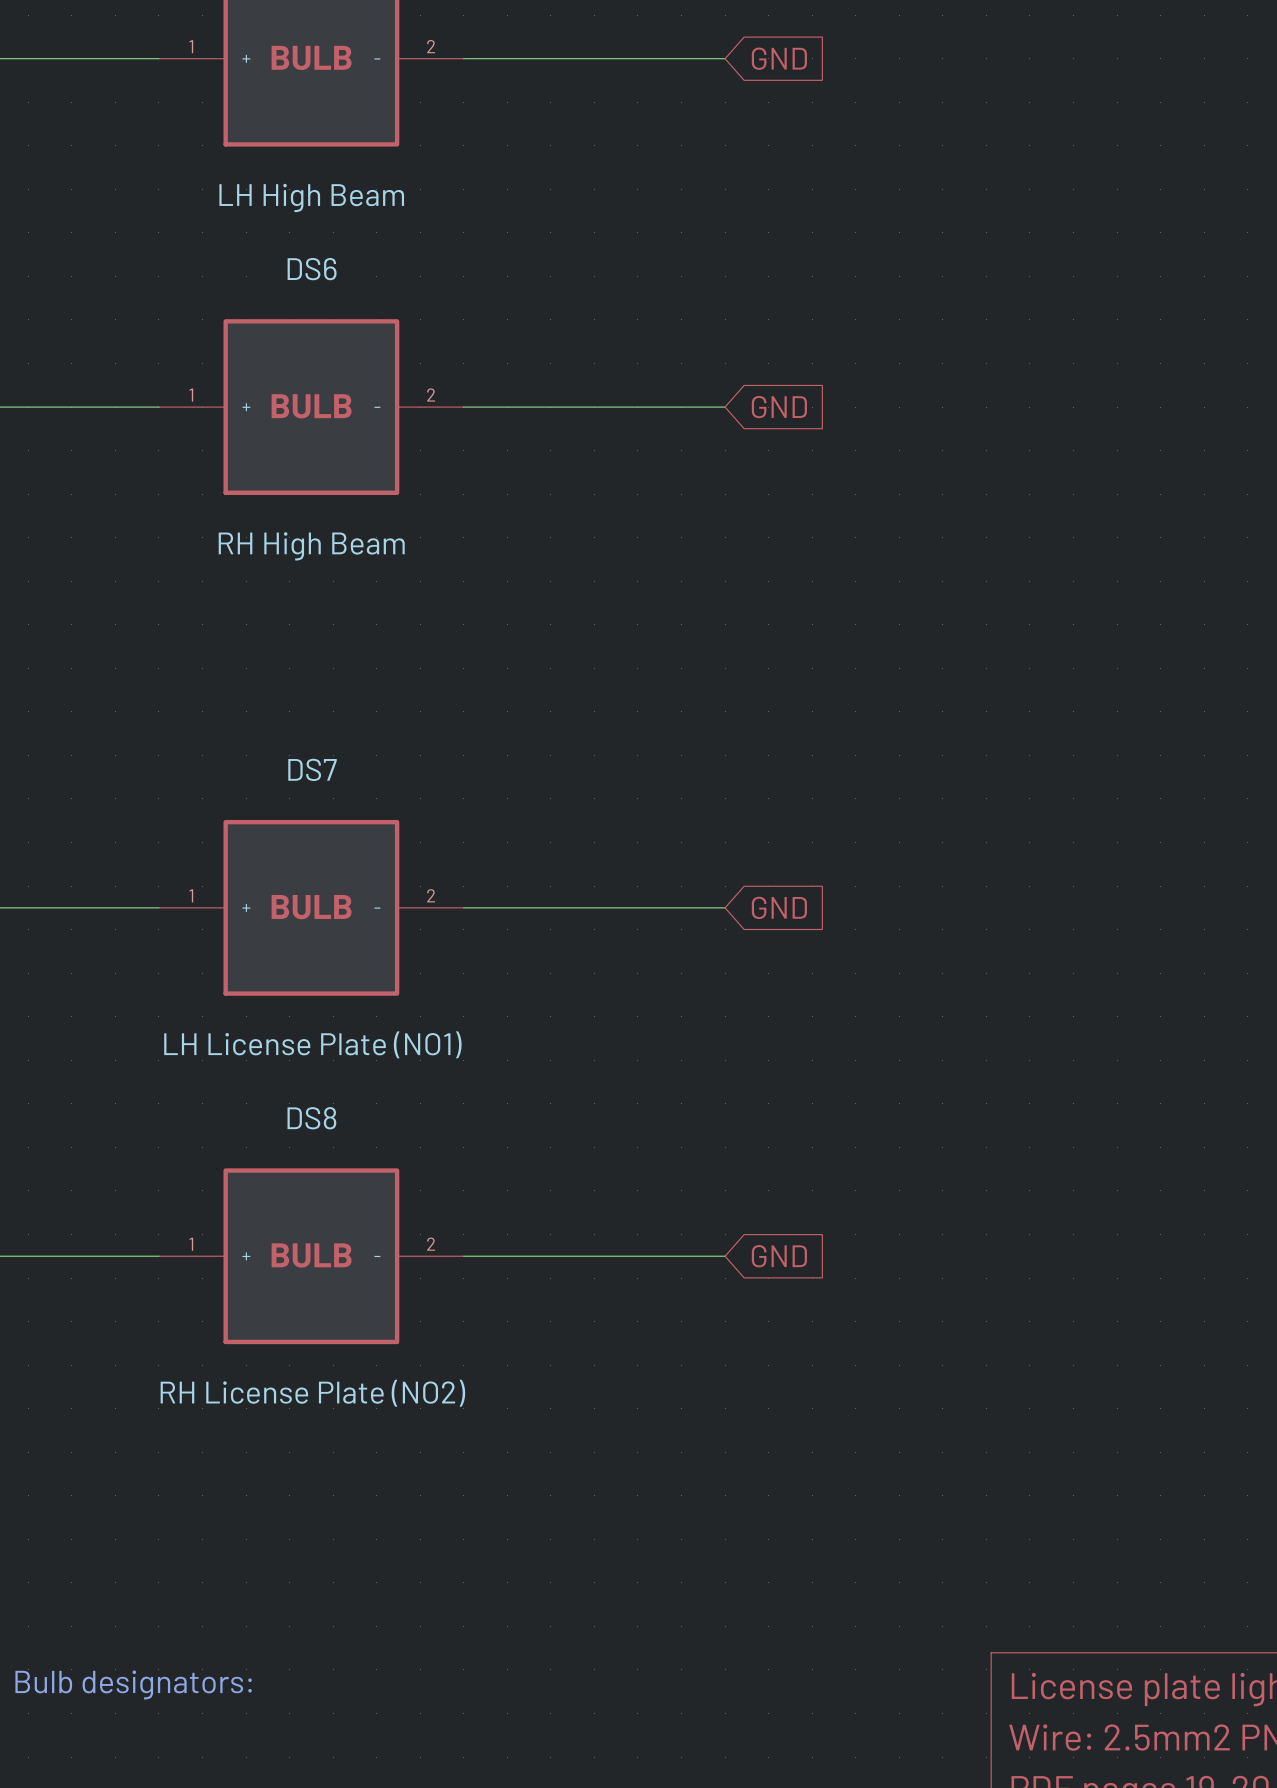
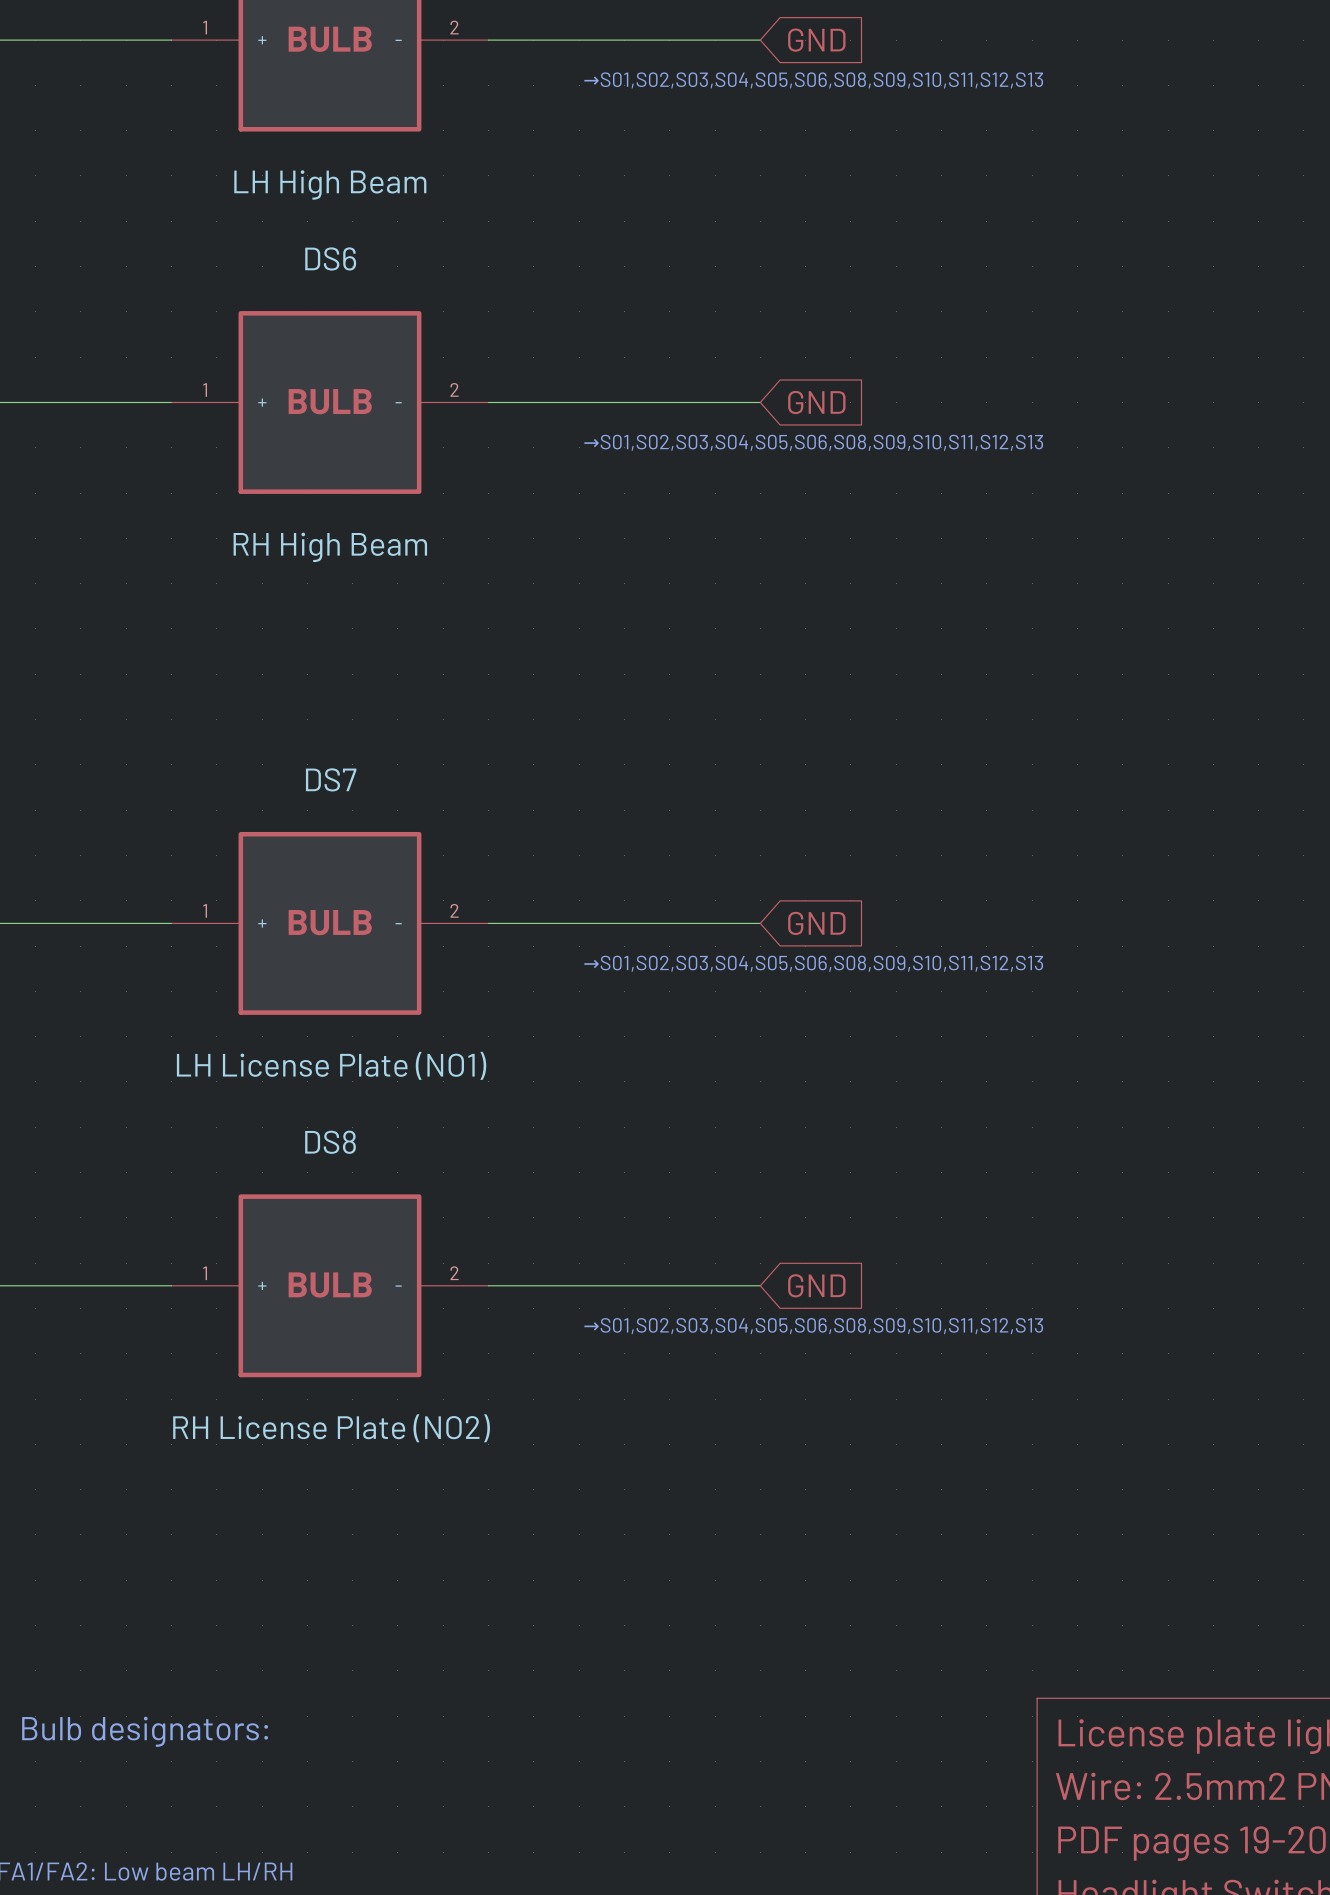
text: none -> →S01,S02,S03,S04,S05,S06,S08,S09,S10,S11,S12,S13 (813, 80)
text: none -> →S01,S02,S03,S04,S05,S06,S08,S09,S10,S11,S12,S13 (813, 442)
text: none -> →S01,S02,S03,S04,S05,S06,S08,S09,S10,S11,S12,S13 (813, 963)
text: none -> →S01,S02,S03,S04,S05,S06,S08,S09,S10,S11,S12,S13 (813, 1326)

